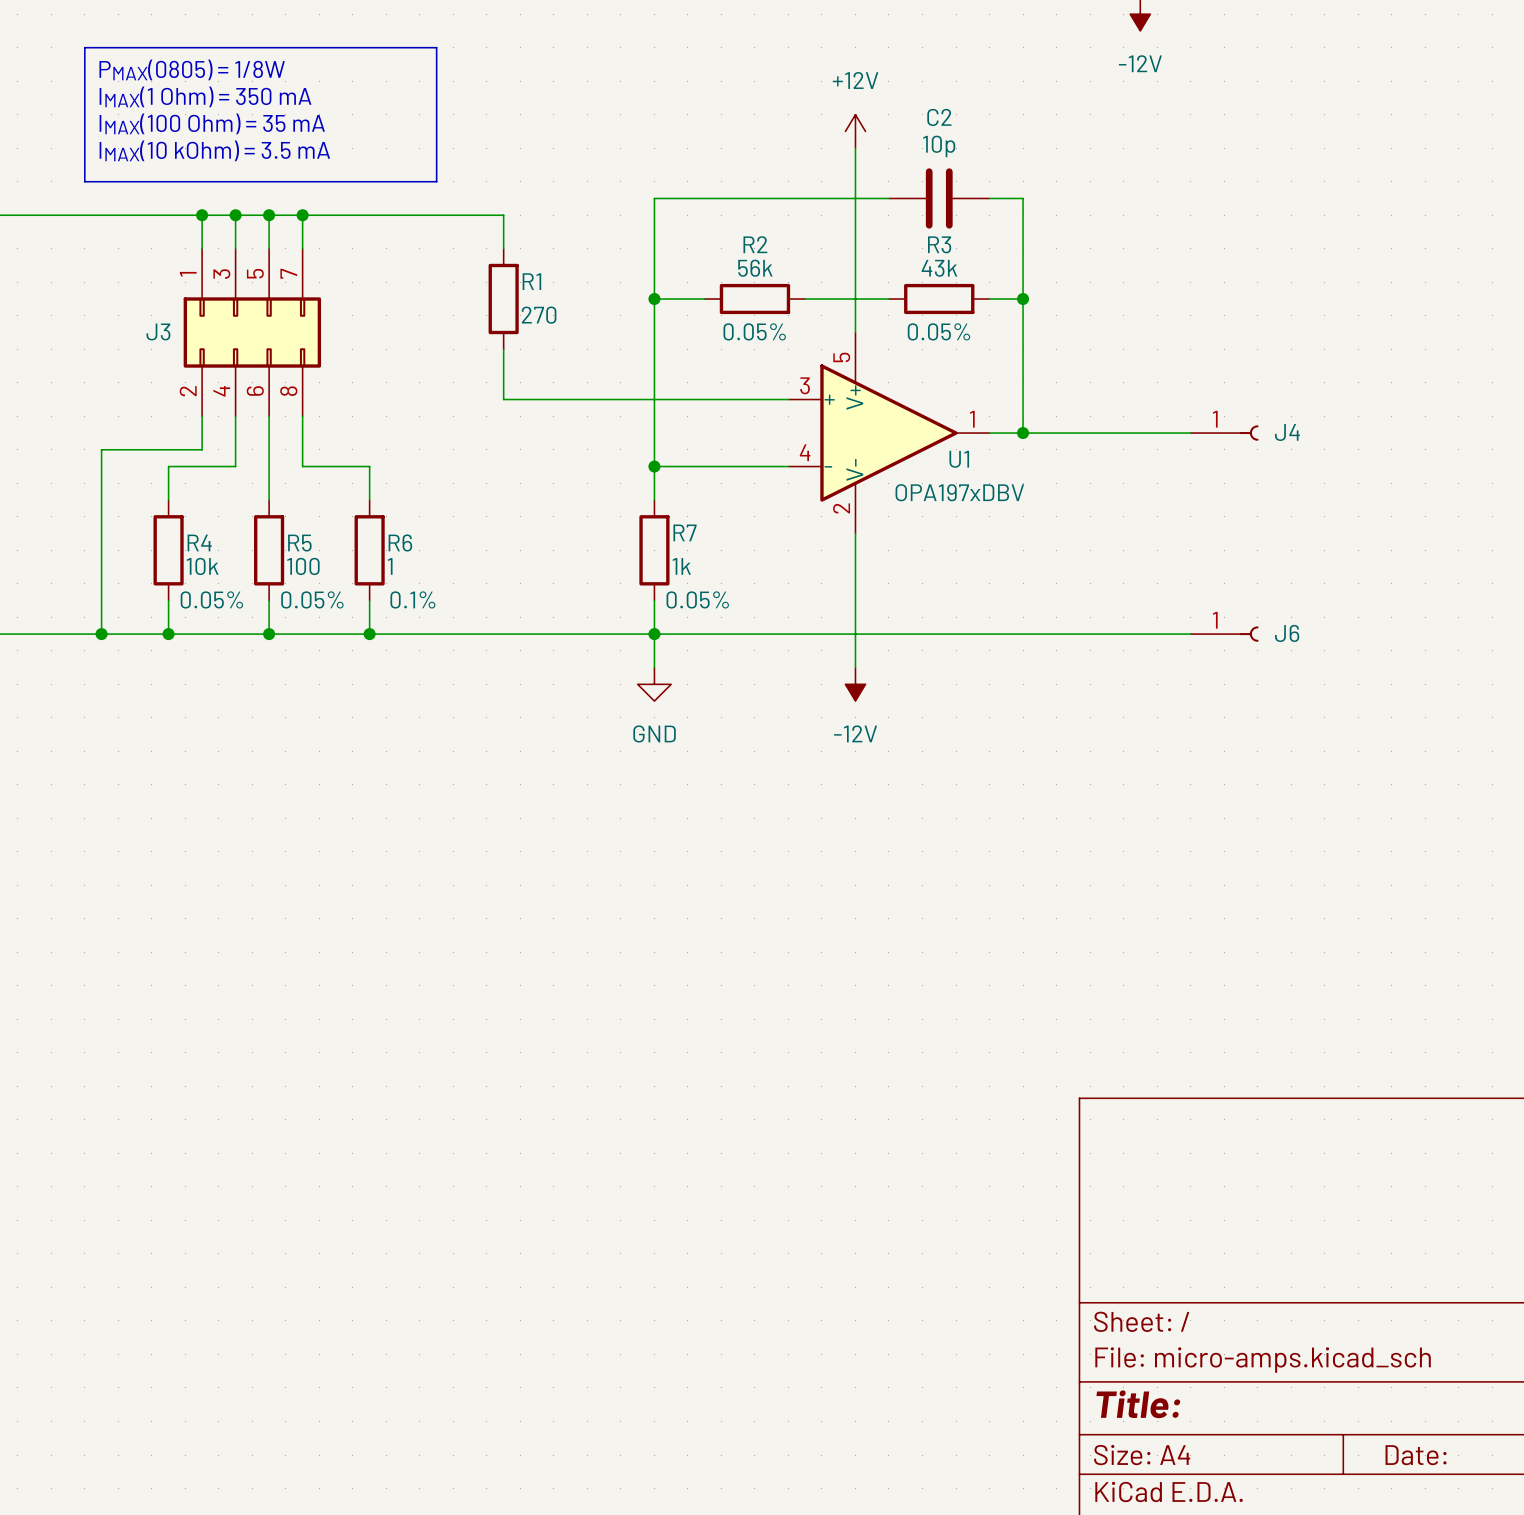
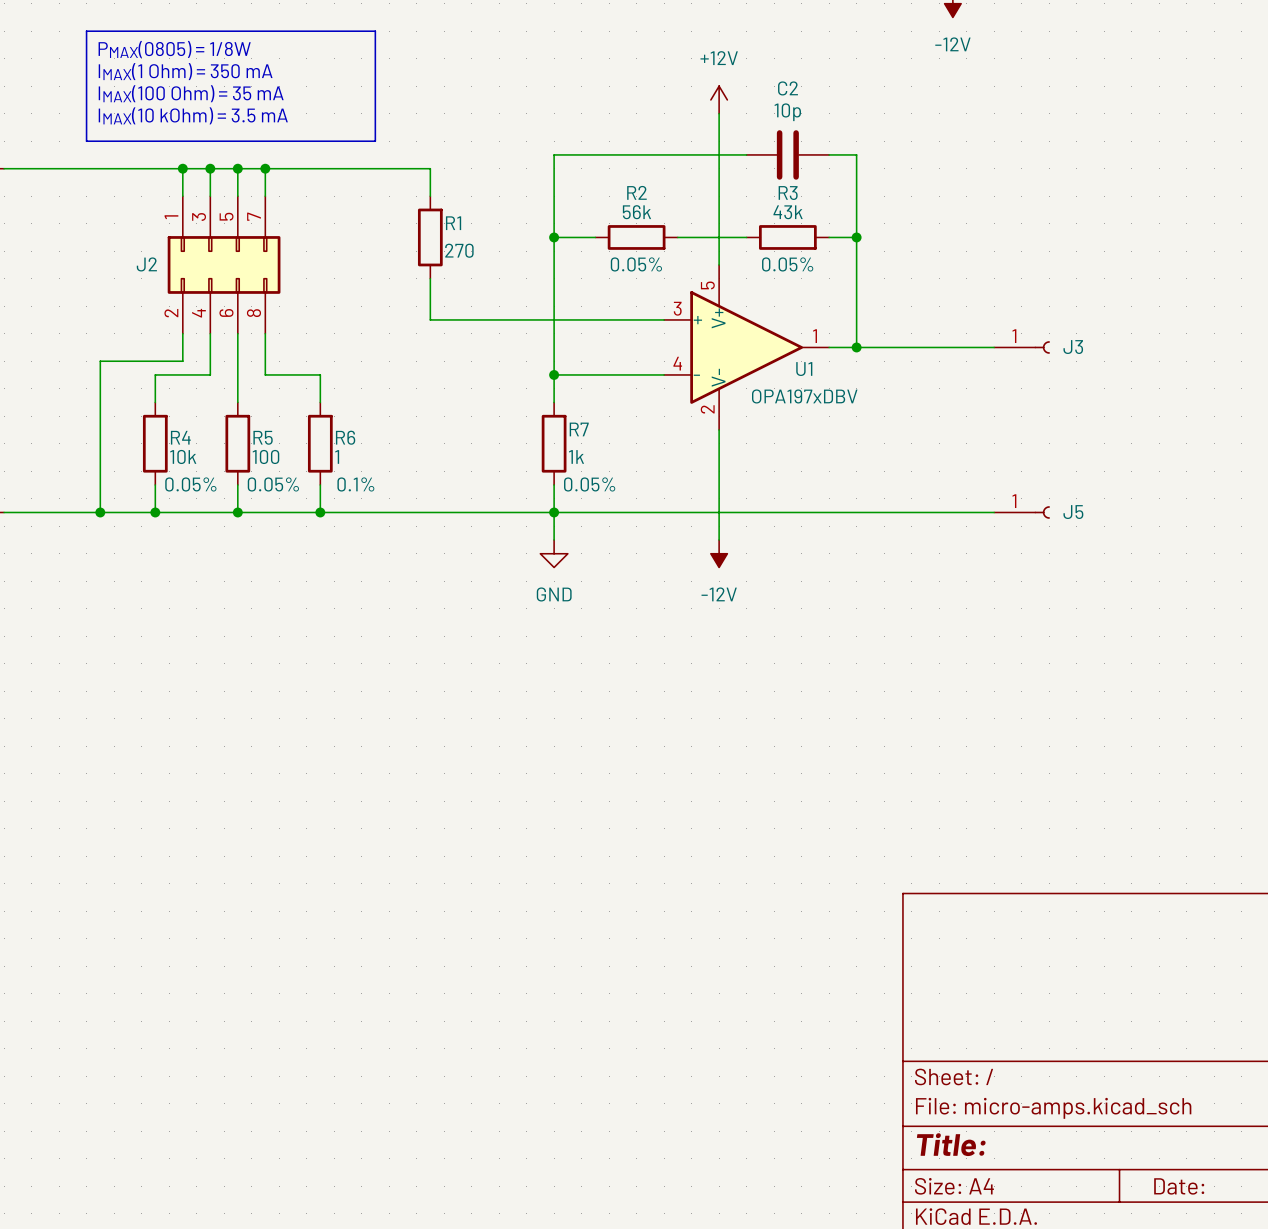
J3 name: J3 (158, 331) -> J2 (146, 264)
J4 name: J4 (1287, 432) -> J3 (1073, 347)
J6 name: J6 (1287, 633) -> J5 (1073, 512)

